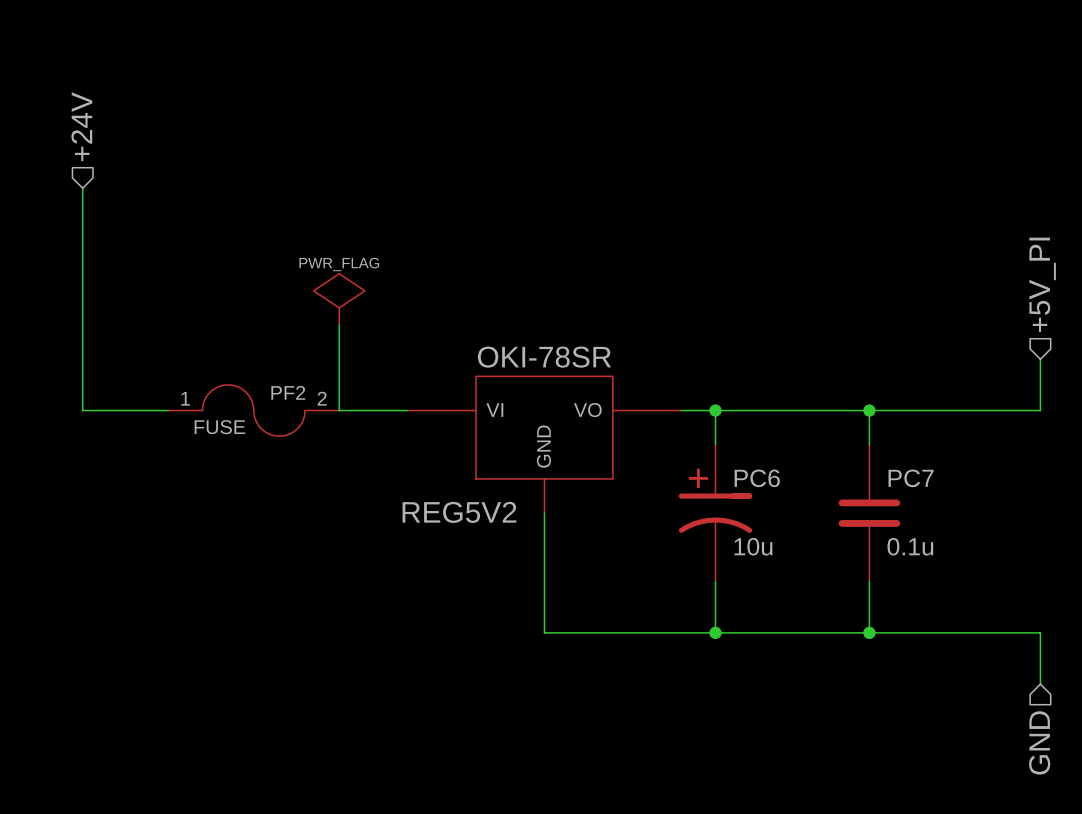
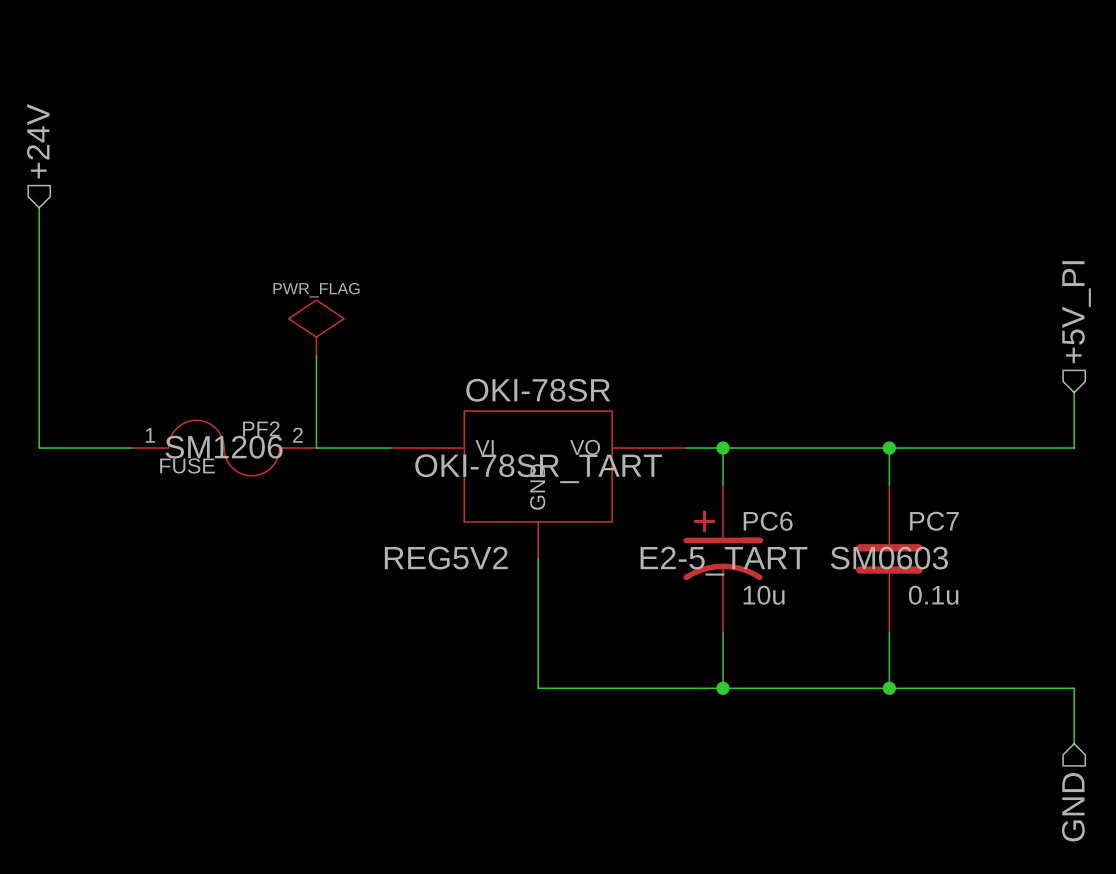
PF2 text: none -> SM1206 (224, 447)
REG5V2 text: none -> OKI-78SR_TART (538, 468)
PC7 text: none -> SM0603 (889, 558)
PC6 text: none -> E2-5_TART (724, 561)

